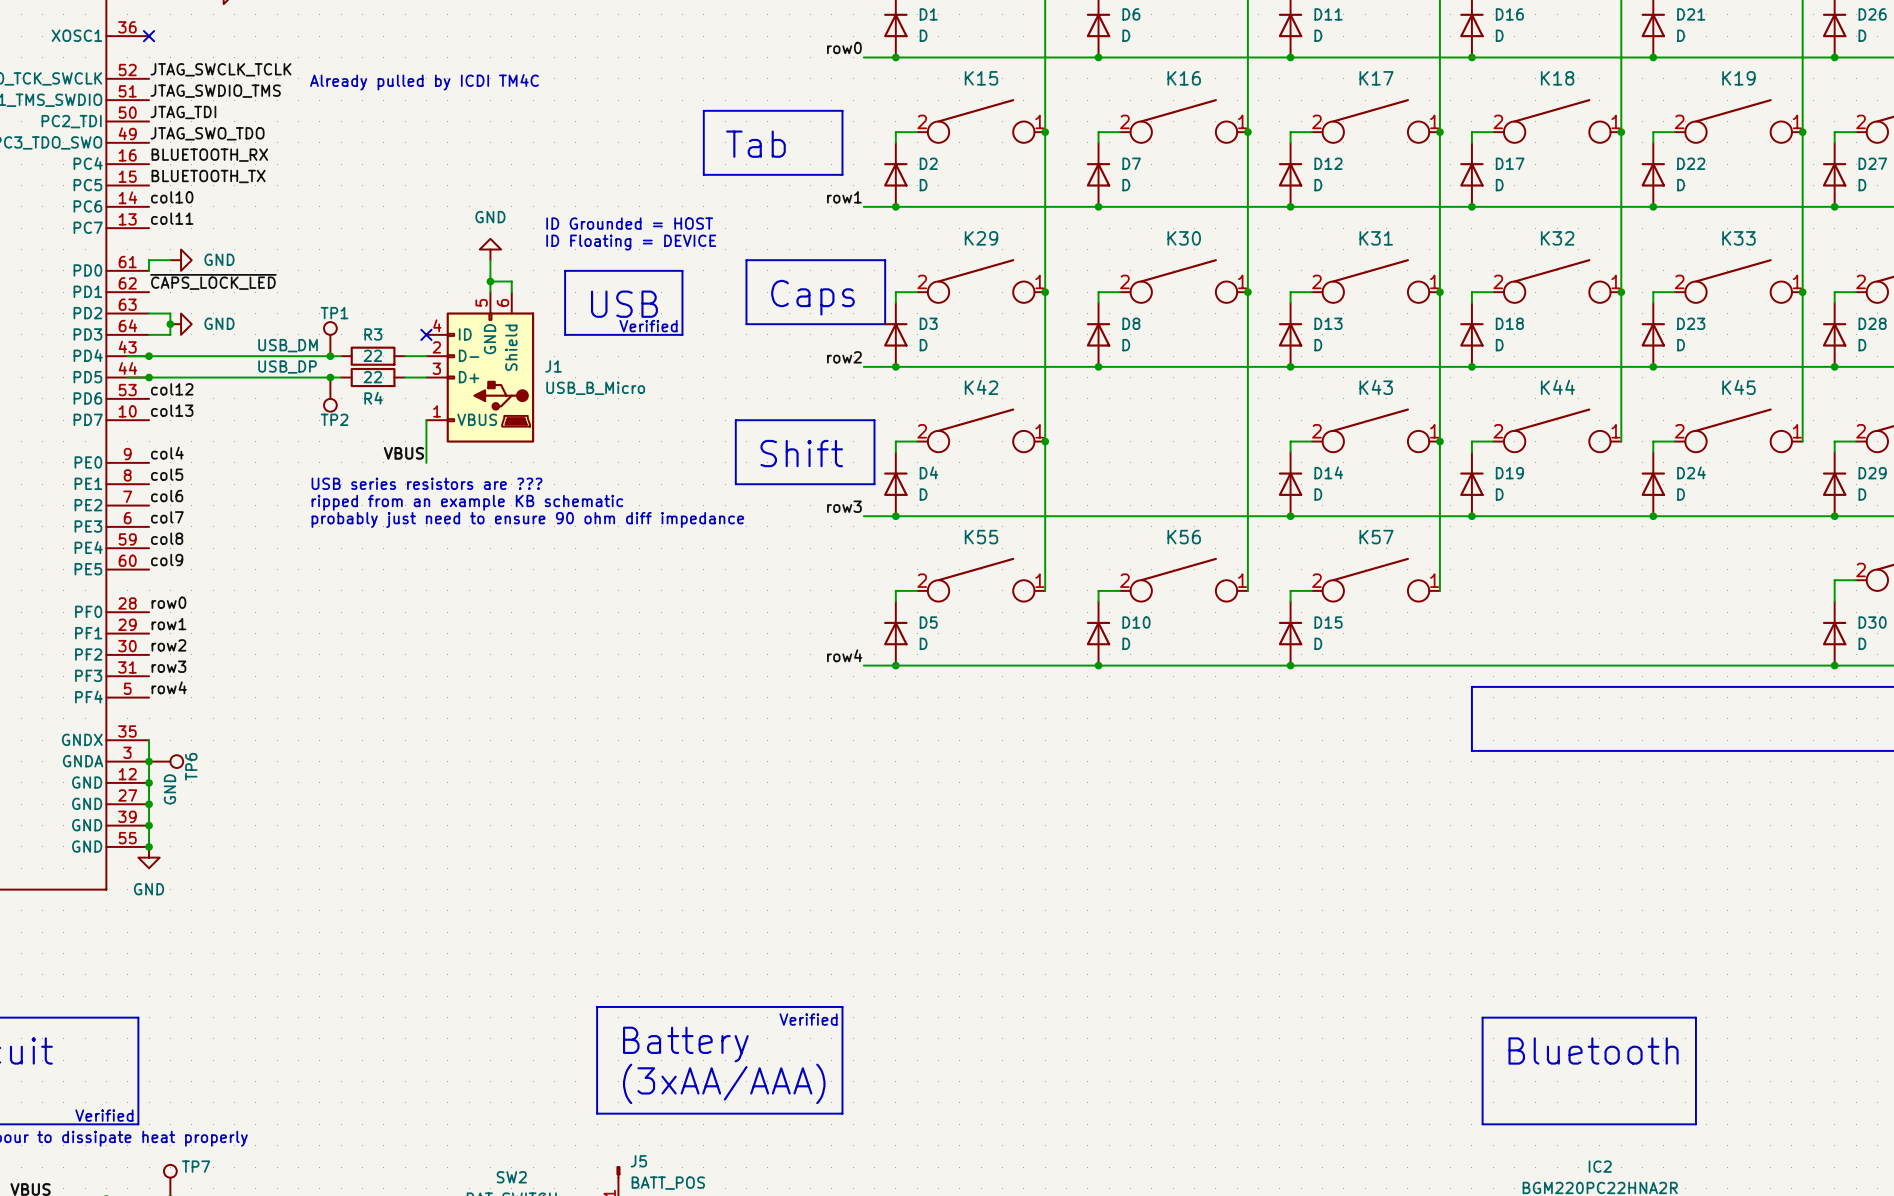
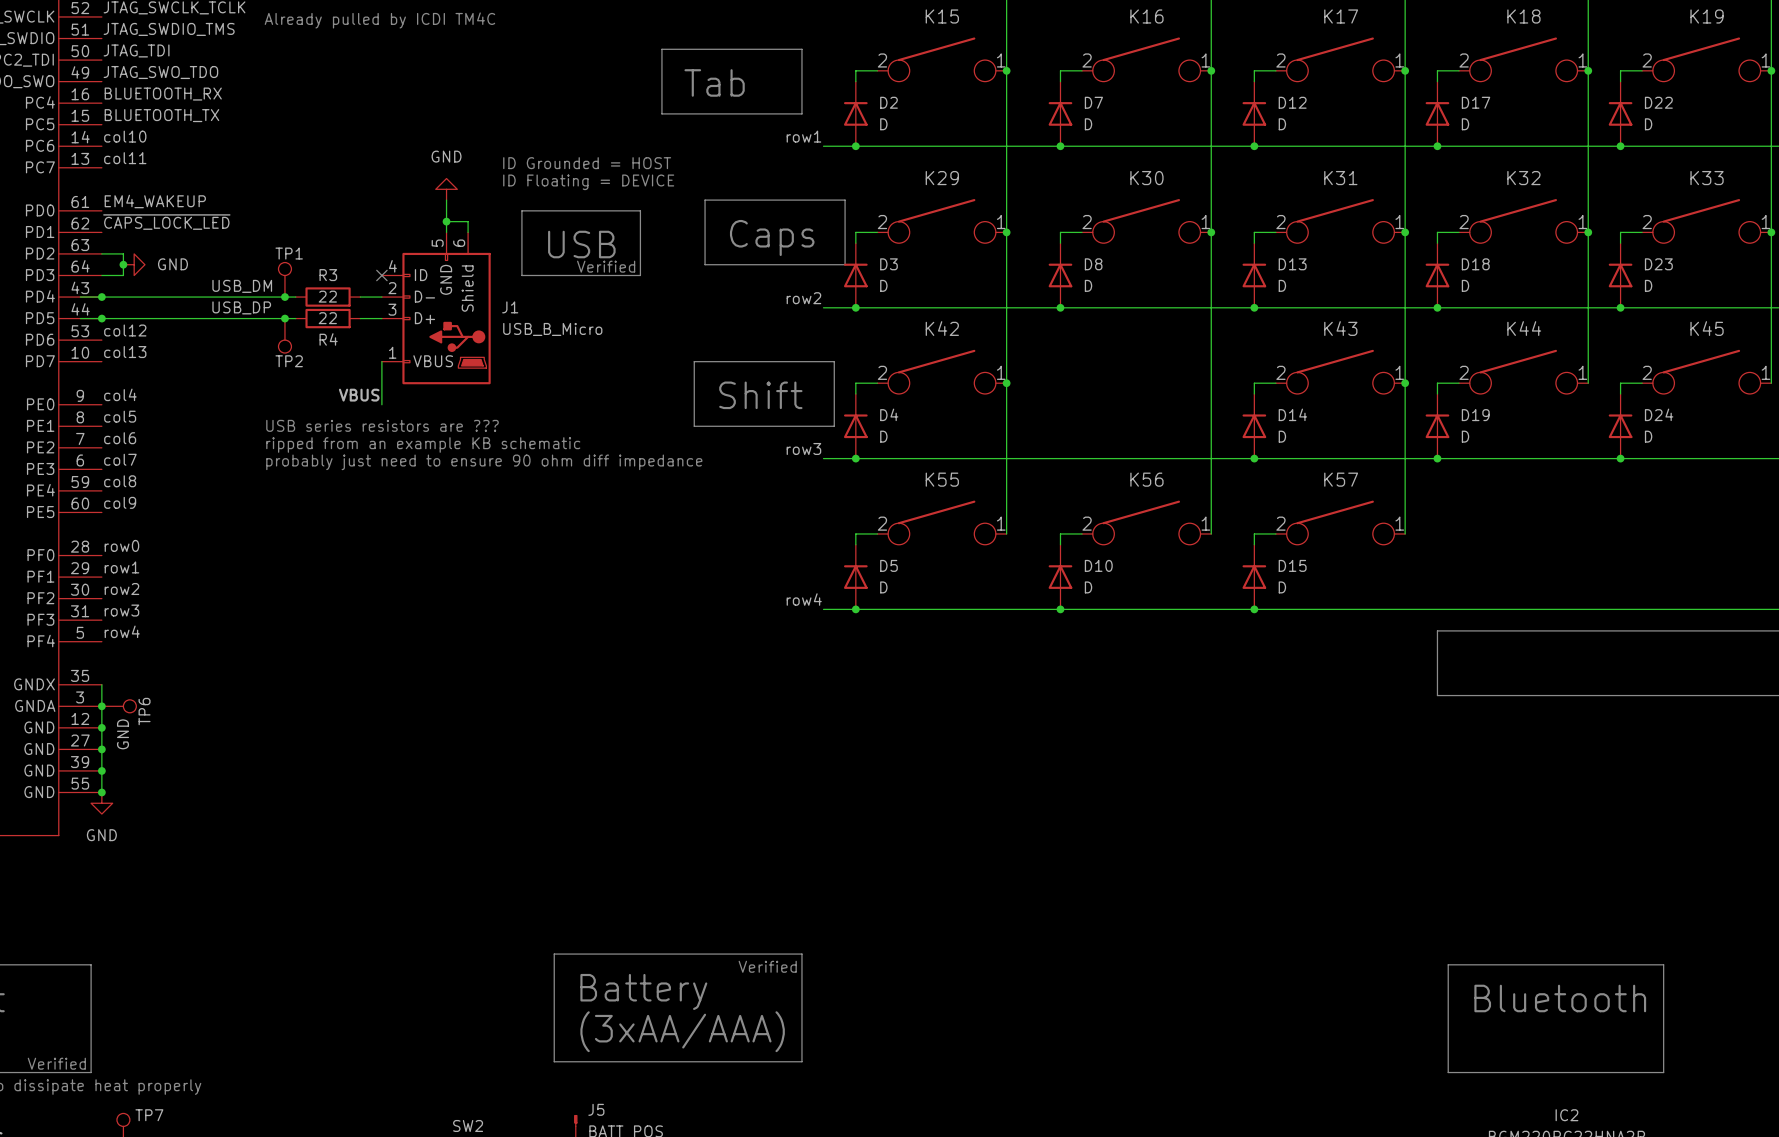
wire: (170, 260) (149, 260) (149, 270) -> none
power symbol: GND (181, 260) -> none
label: none -> EM4_WAKEUP (155, 201)

